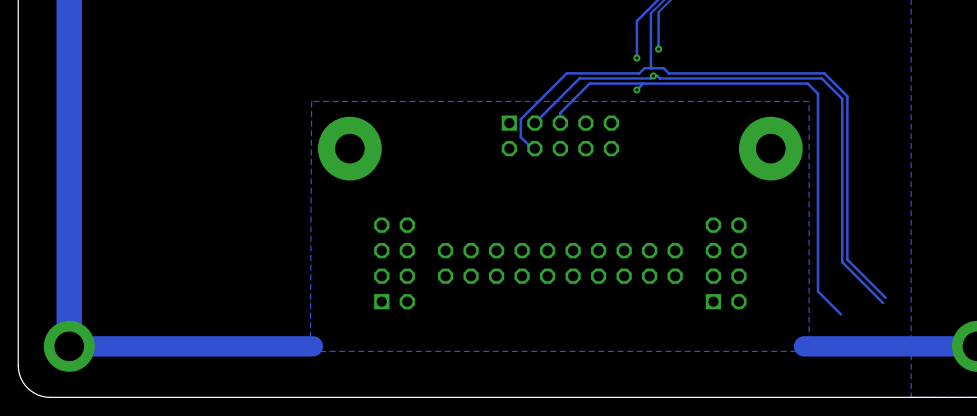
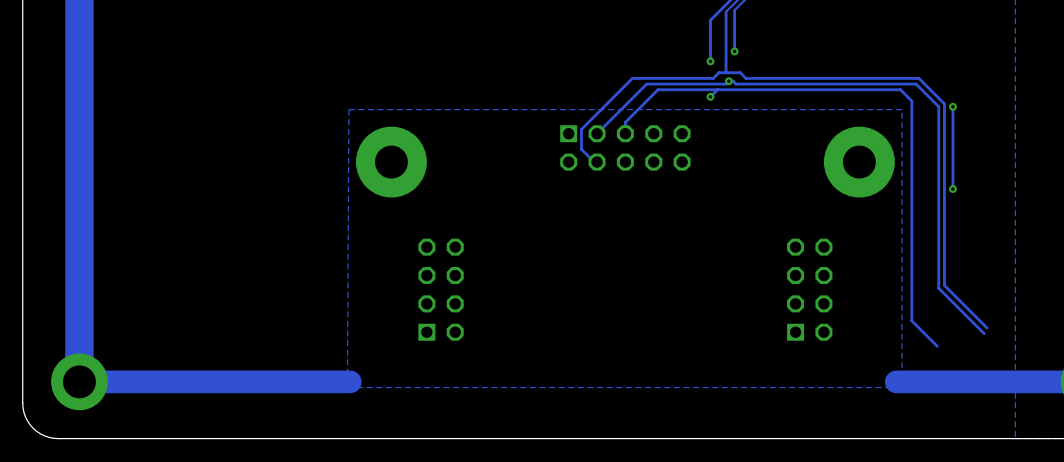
track: none -> (952, 106) (952, 189)
via: none -> (952, 106)
via: none -> (952, 189)
part: (560, 263) -> none

